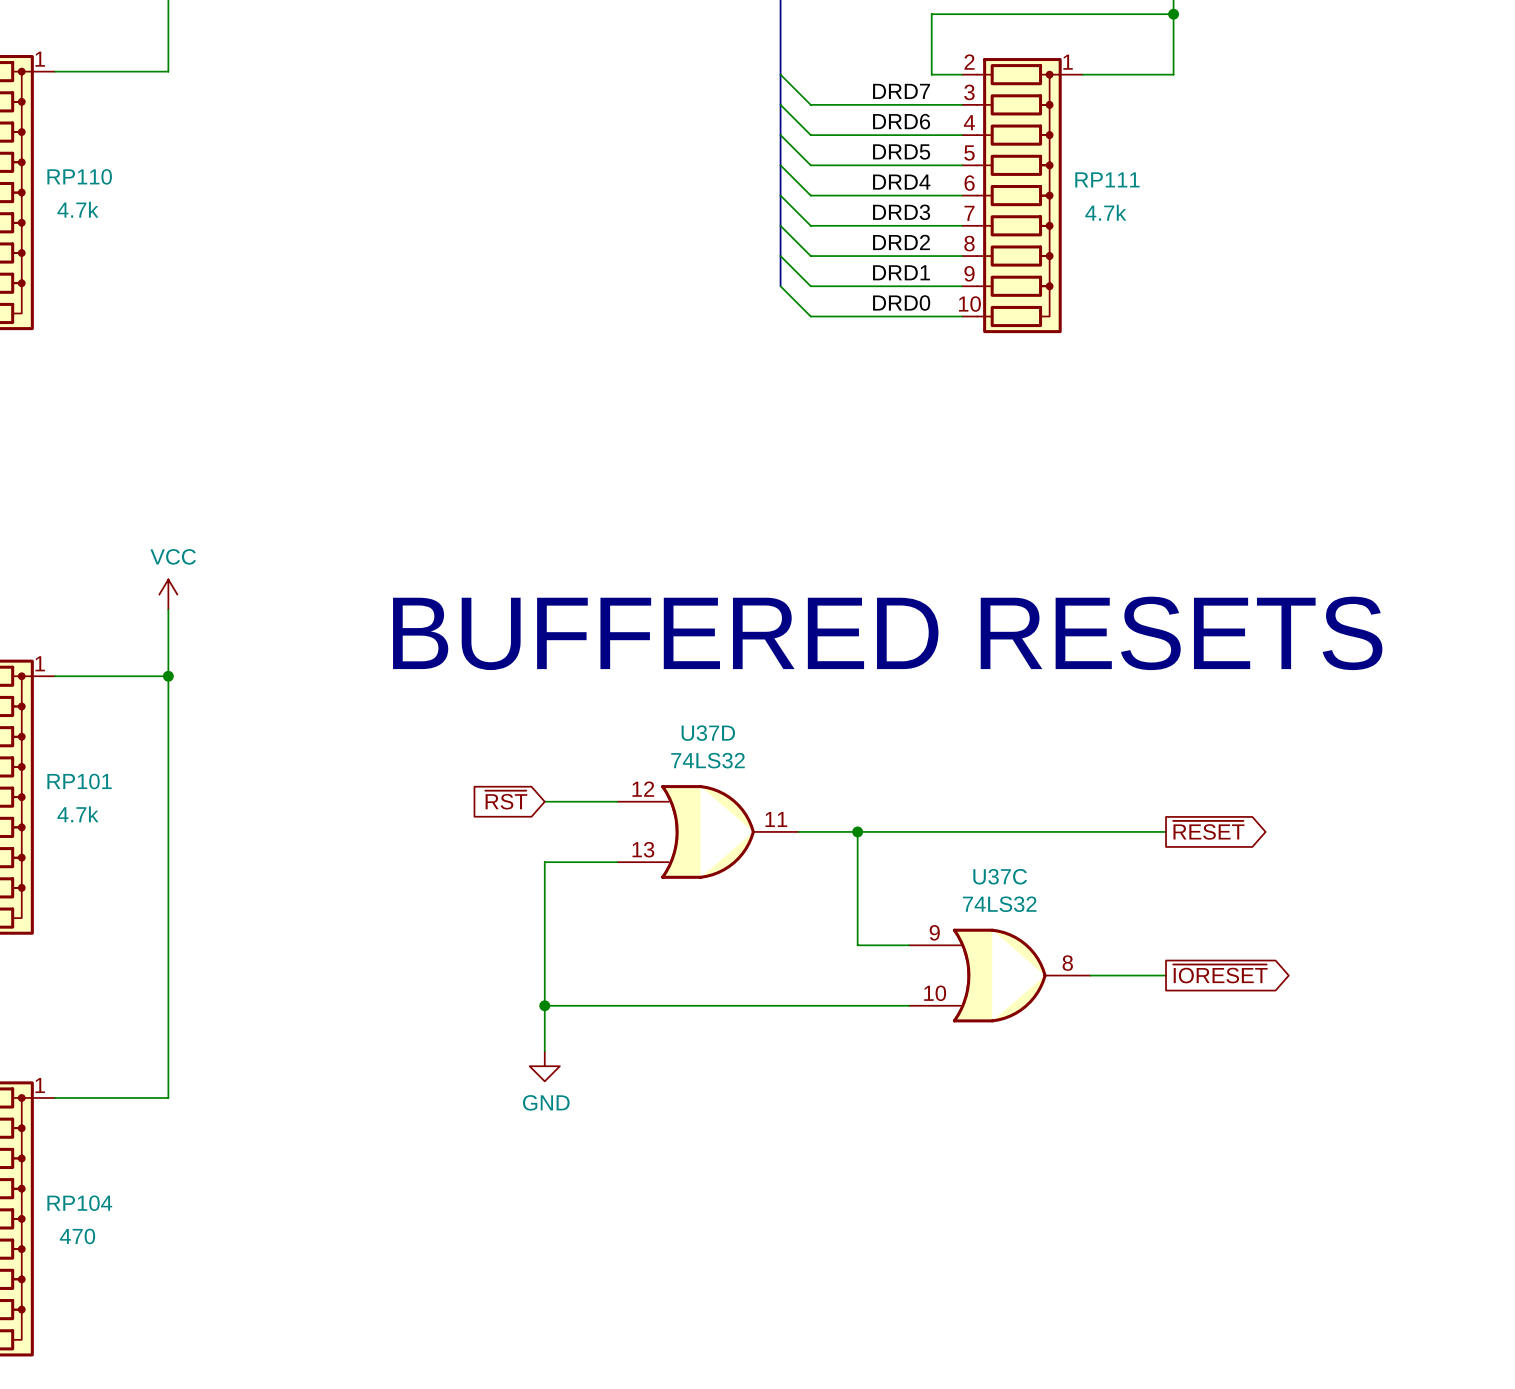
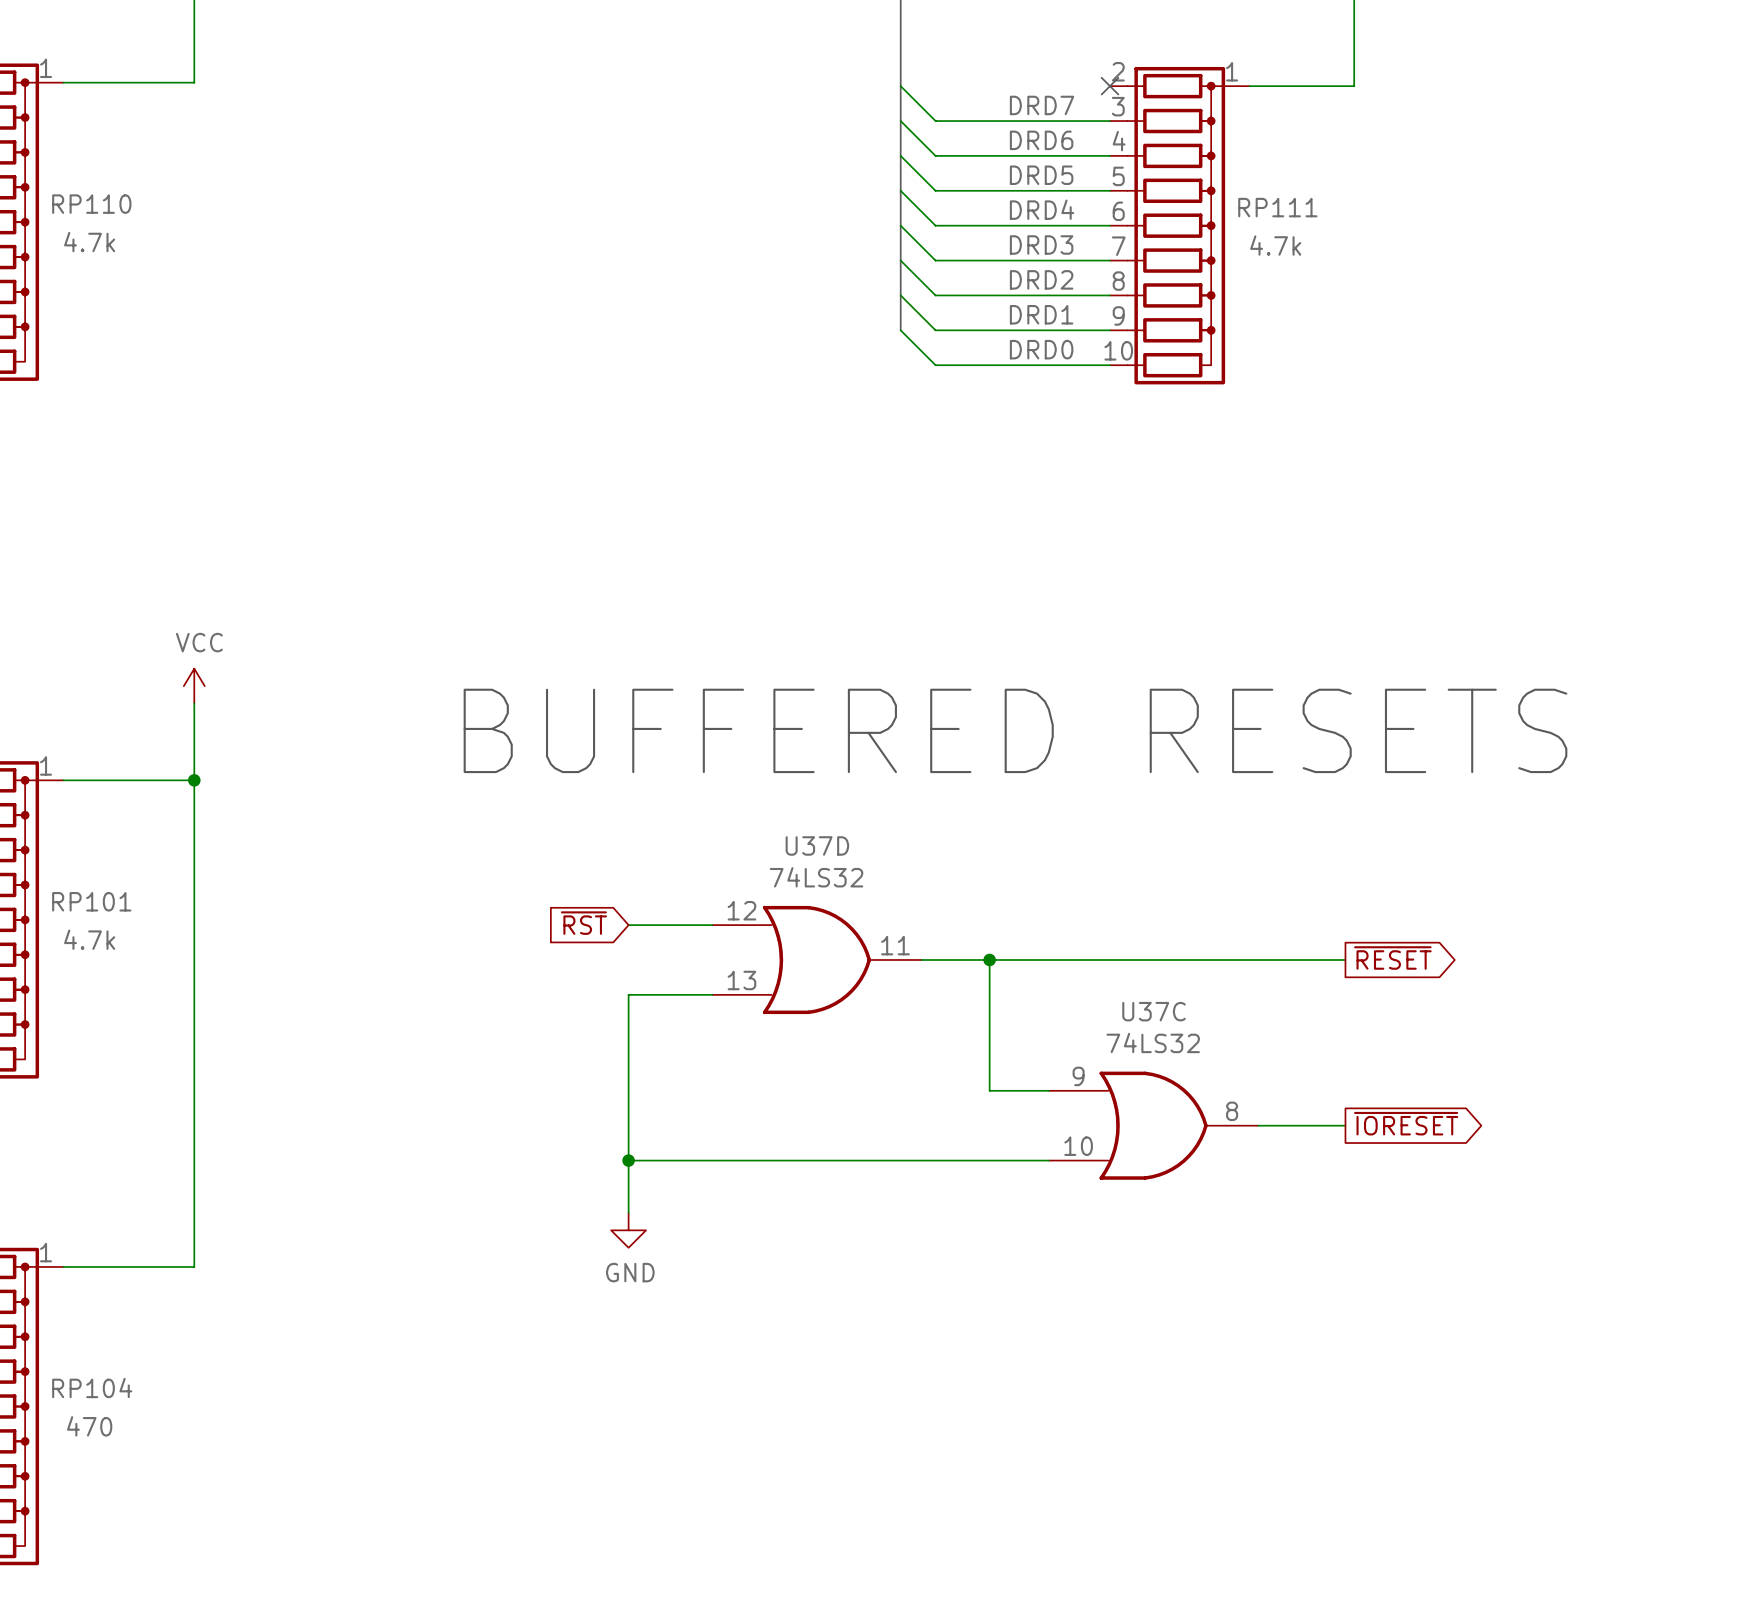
wire: (1173, 14) (931, 14) (931, 74) (961, 74) -> none
junction: (1173, 14) -> none
no-connect mark: none -> (1110, 86)

